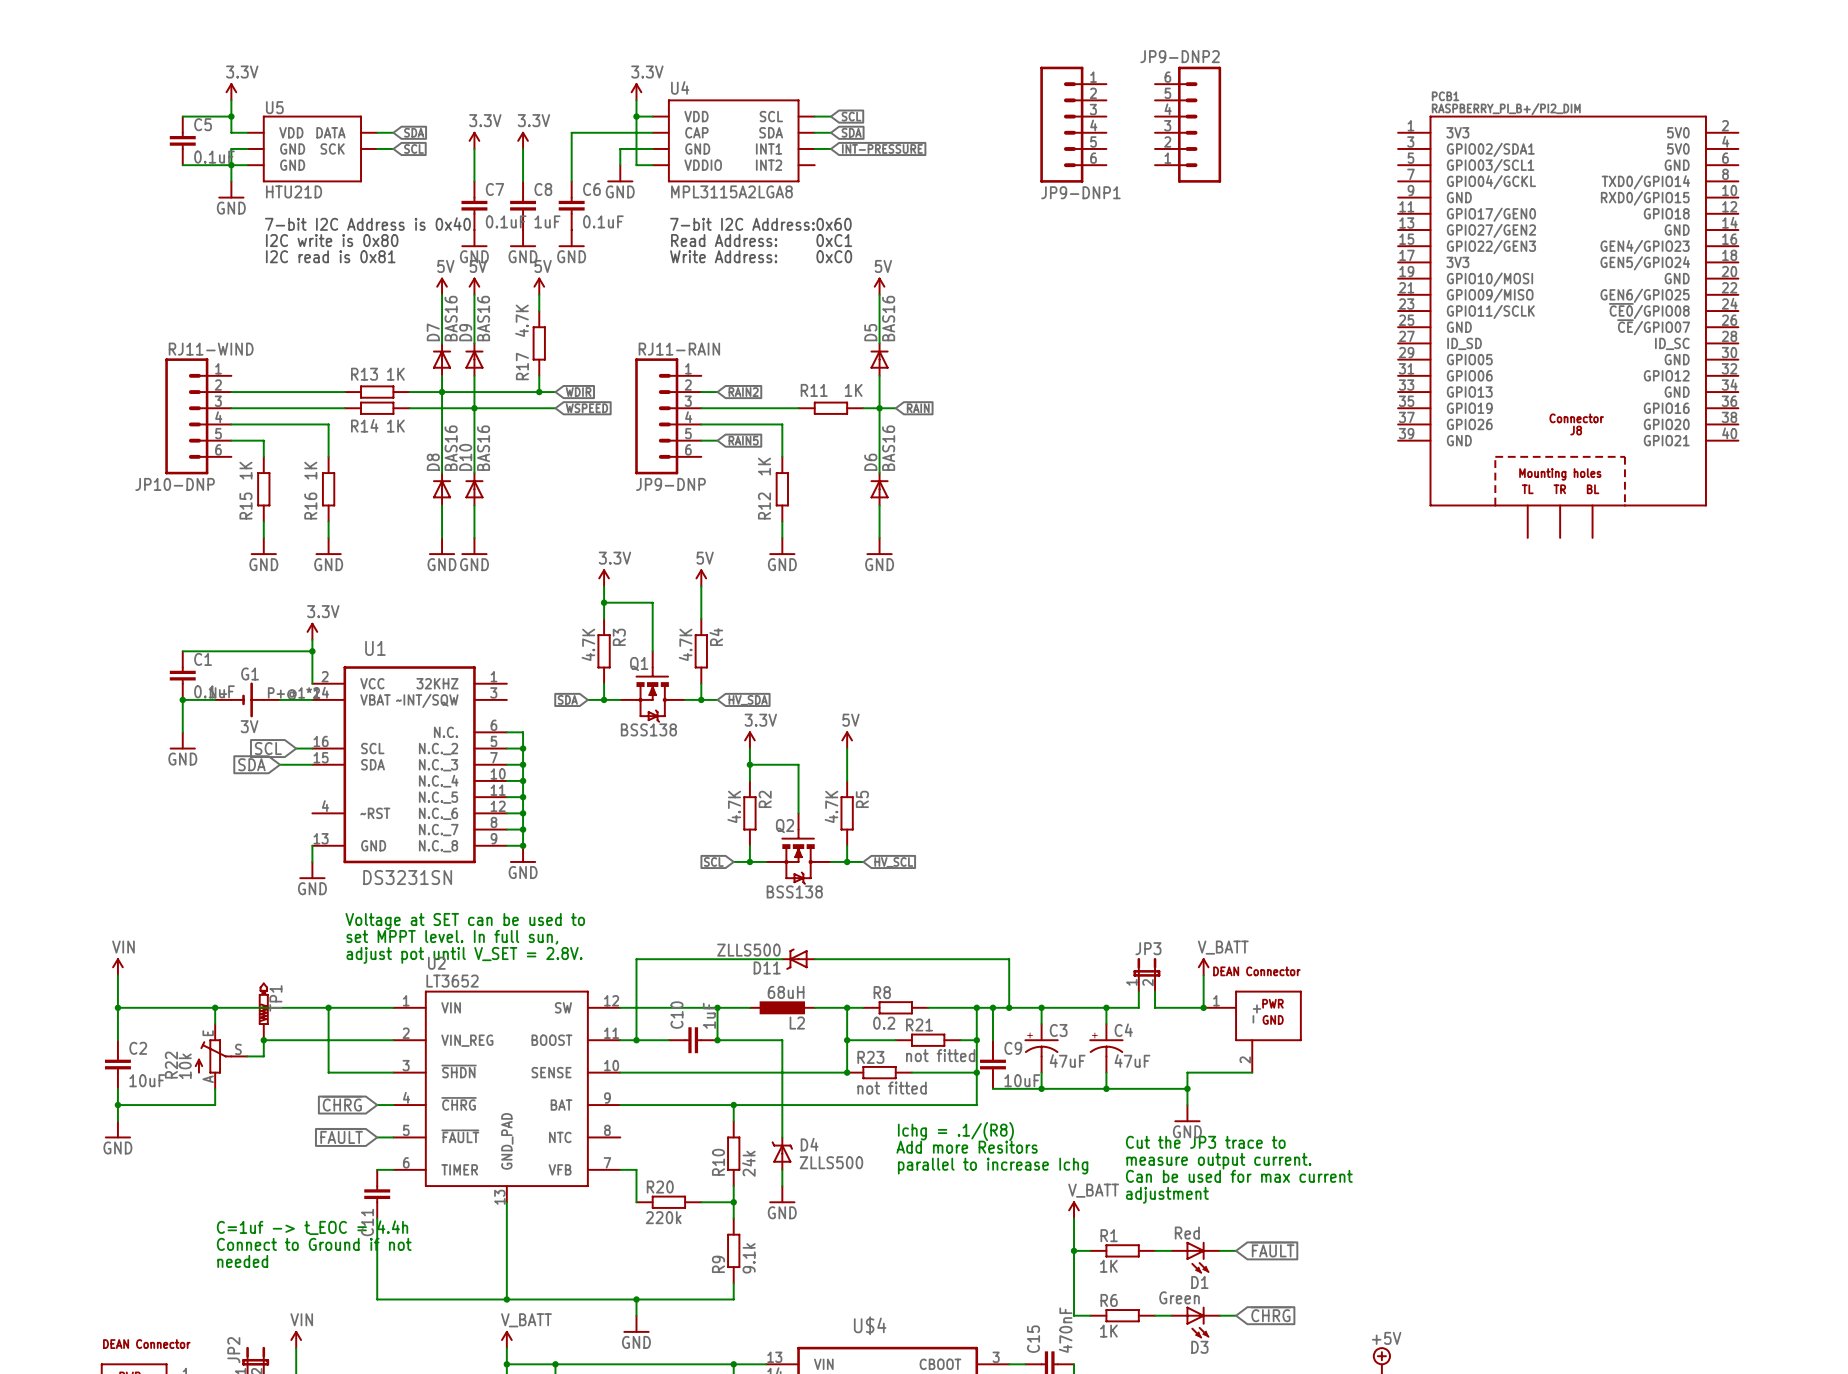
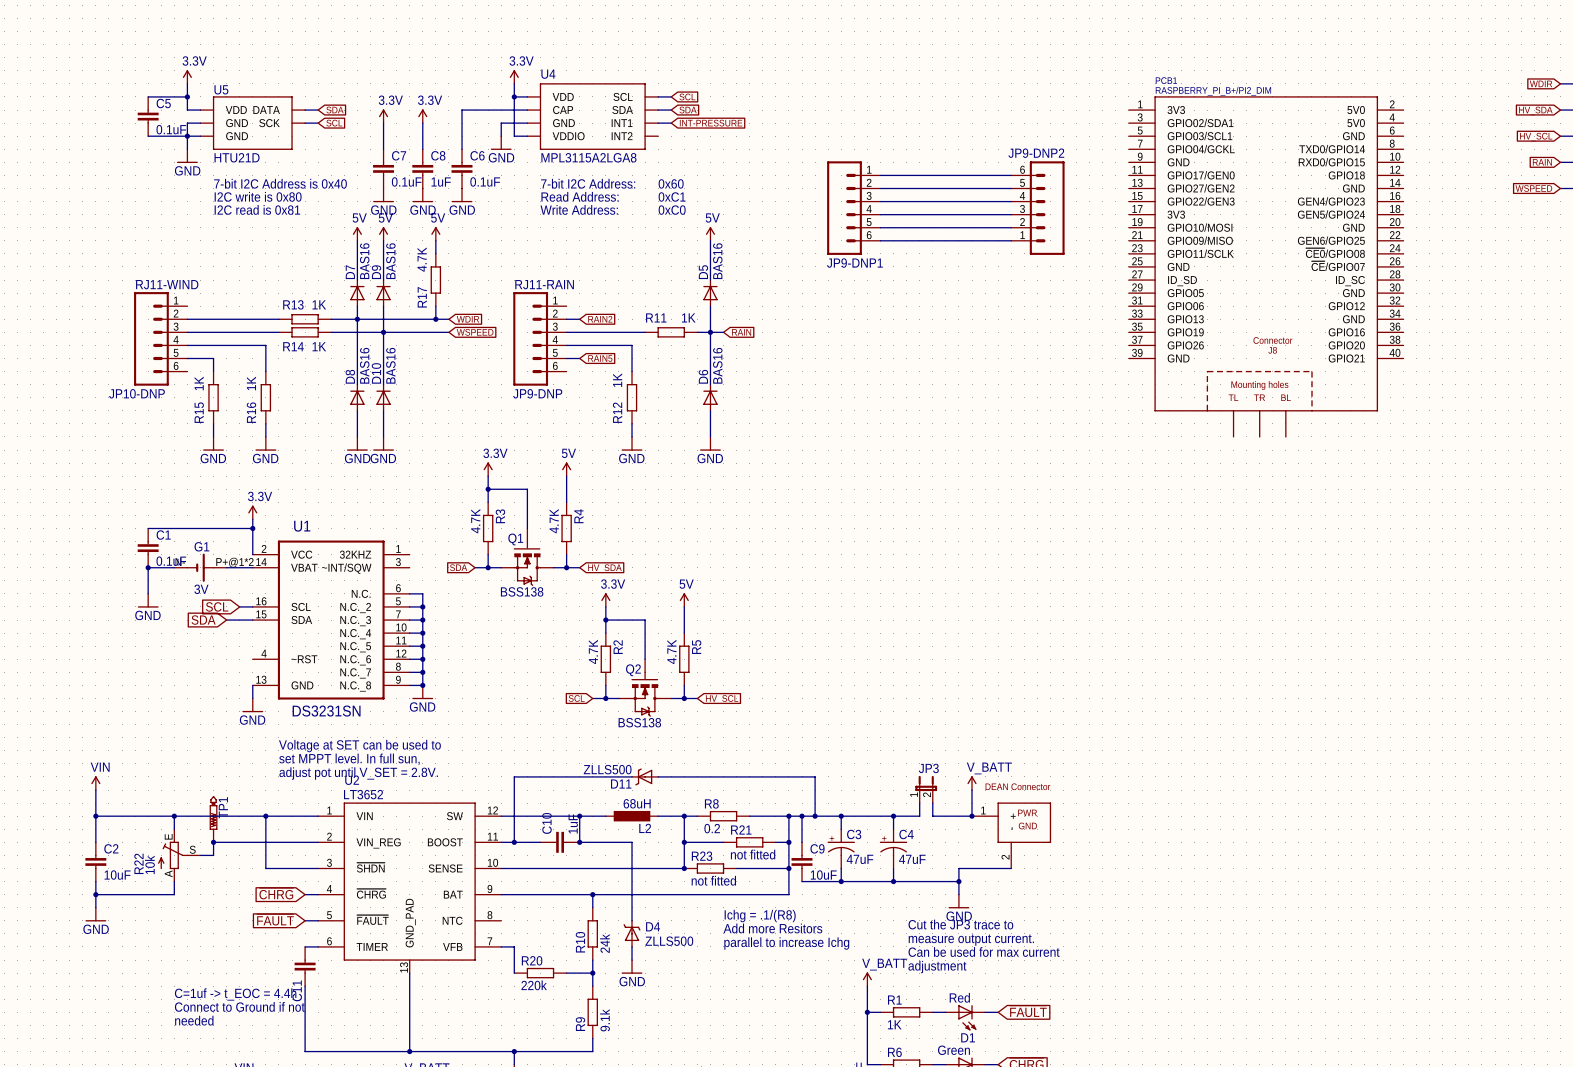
JP9-DNP1 position: (1073, 124) -> (853, 208)
JP9-DNP2 position: (1188, 124) -> (1037, 208)
wire: none -> (880, 175) (1011, 175)
wire: none -> (880, 188) (1011, 188)
wire: none -> (880, 201) (1011, 201)
wire: none -> (880, 214) (1011, 214)
wire: none -> (880, 227) (1011, 227)
wire: none -> (880, 240) (1011, 240)

